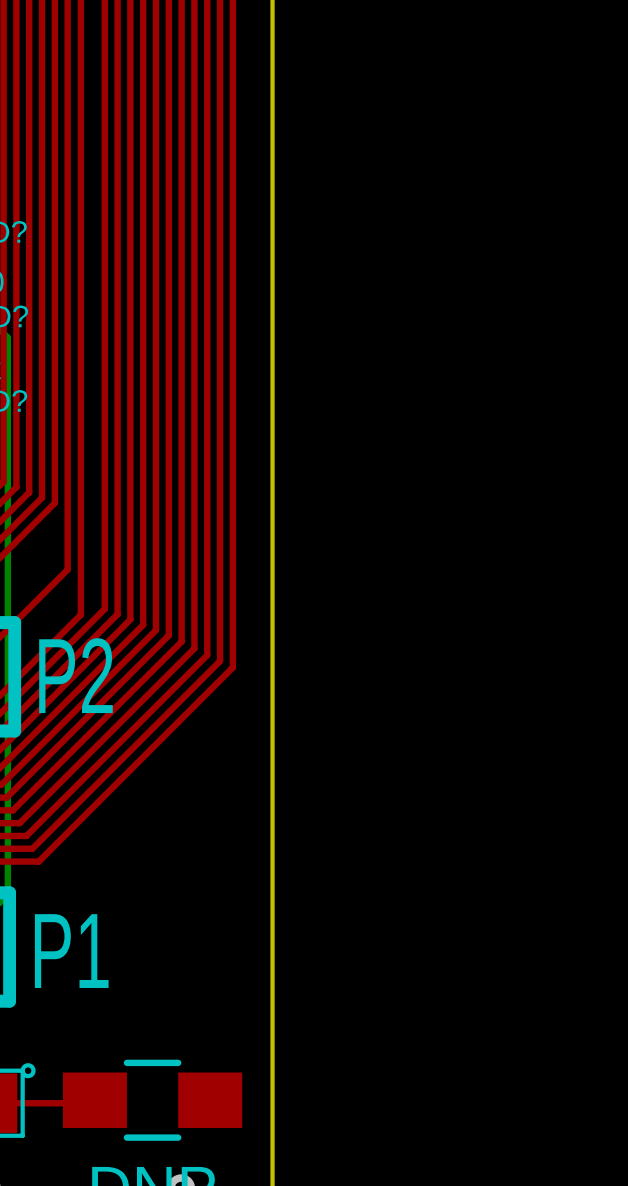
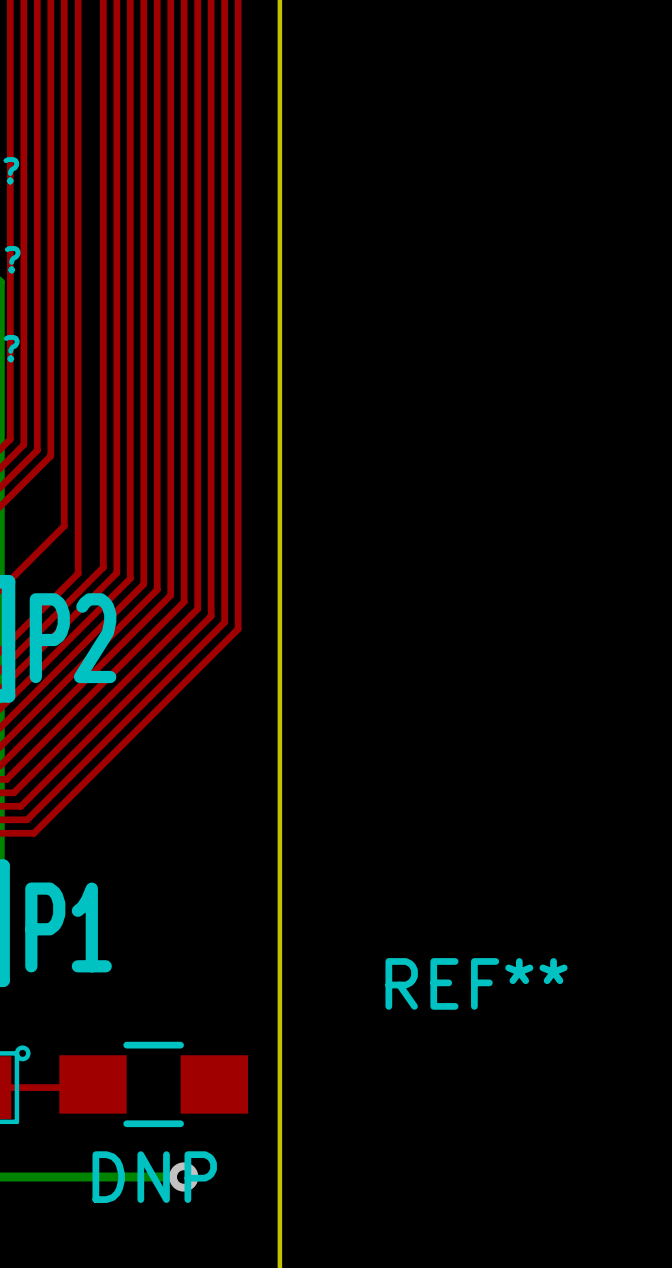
REF** name: none -> REF** (476, 983)

